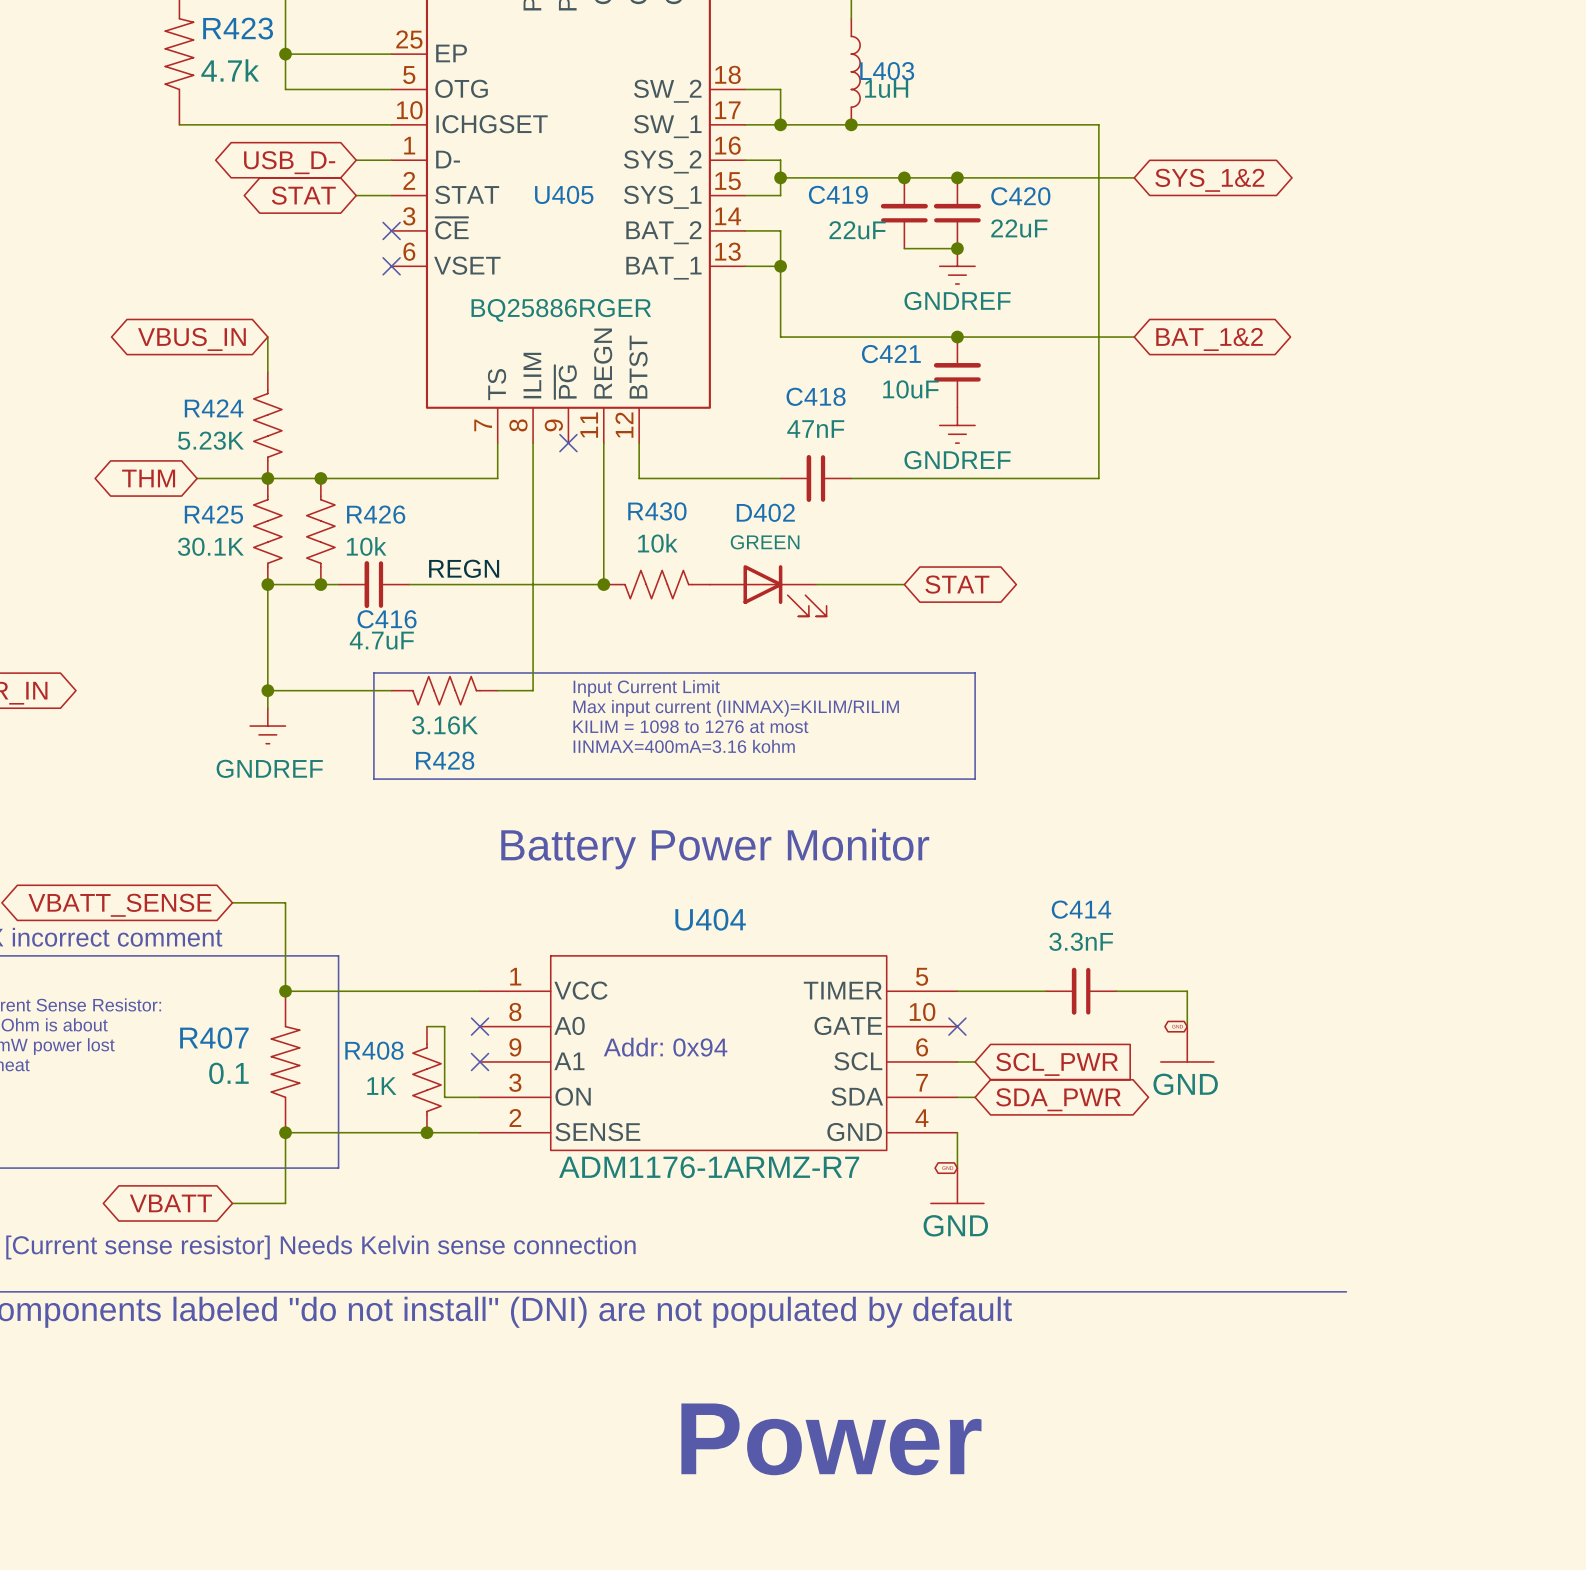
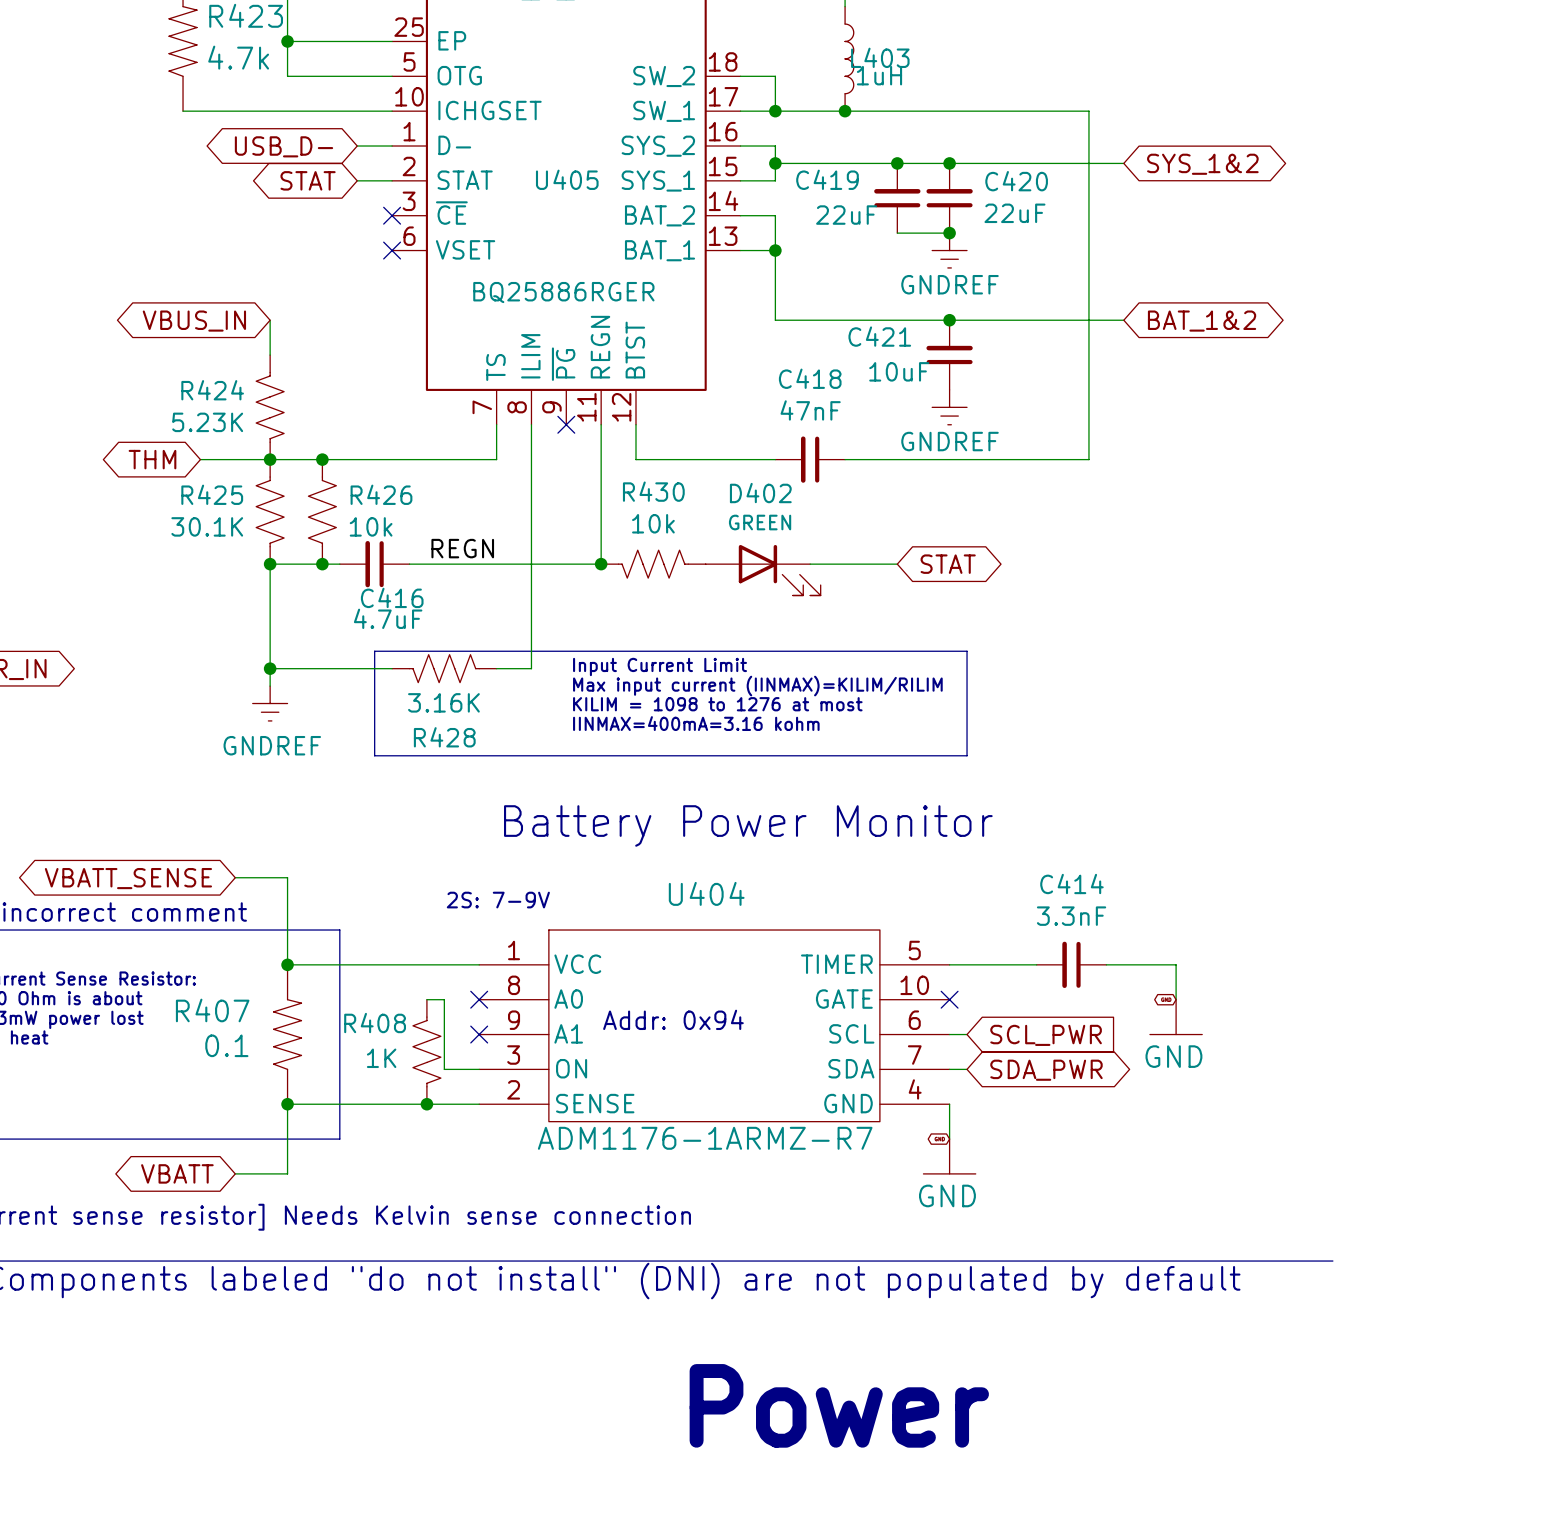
text: none -> 2S: 7-9V (498, 900)

